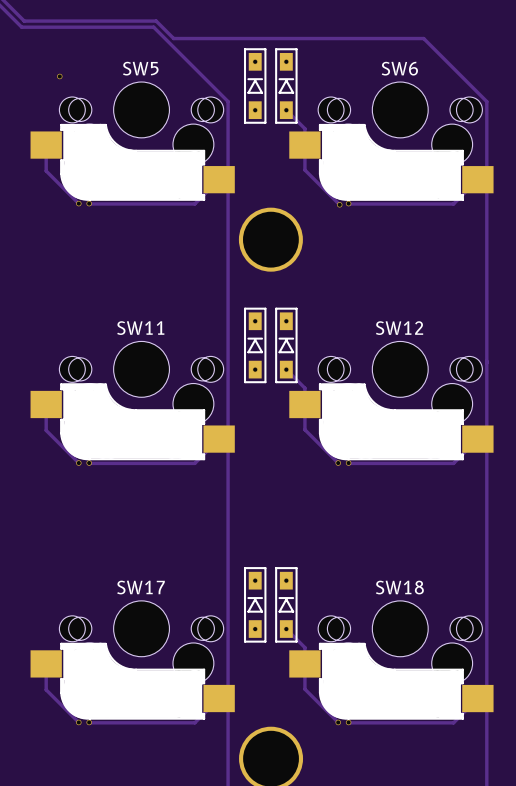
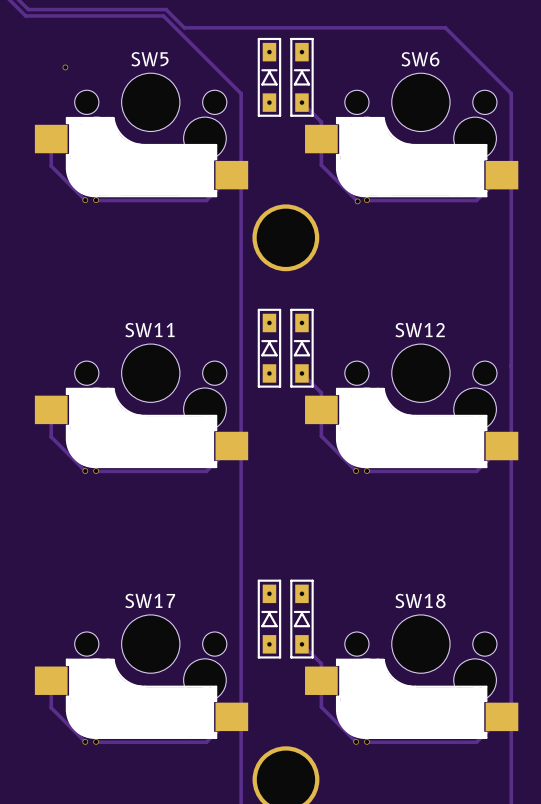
SW5 footprint: [30, 82, 235, 201] -> [34, 73, 249, 198]
SW6 footprint: [289, 82, 494, 201] -> [305, 73, 519, 198]
SW11 footprint: [30, 341, 235, 461] -> [34, 344, 249, 469]
SW12 footprint: [289, 341, 494, 461] -> [305, 344, 519, 469]
SW17 footprint: [30, 600, 235, 720] -> [34, 614, 249, 739]
SW18 footprint: [289, 600, 494, 720] -> [305, 614, 519, 739]

